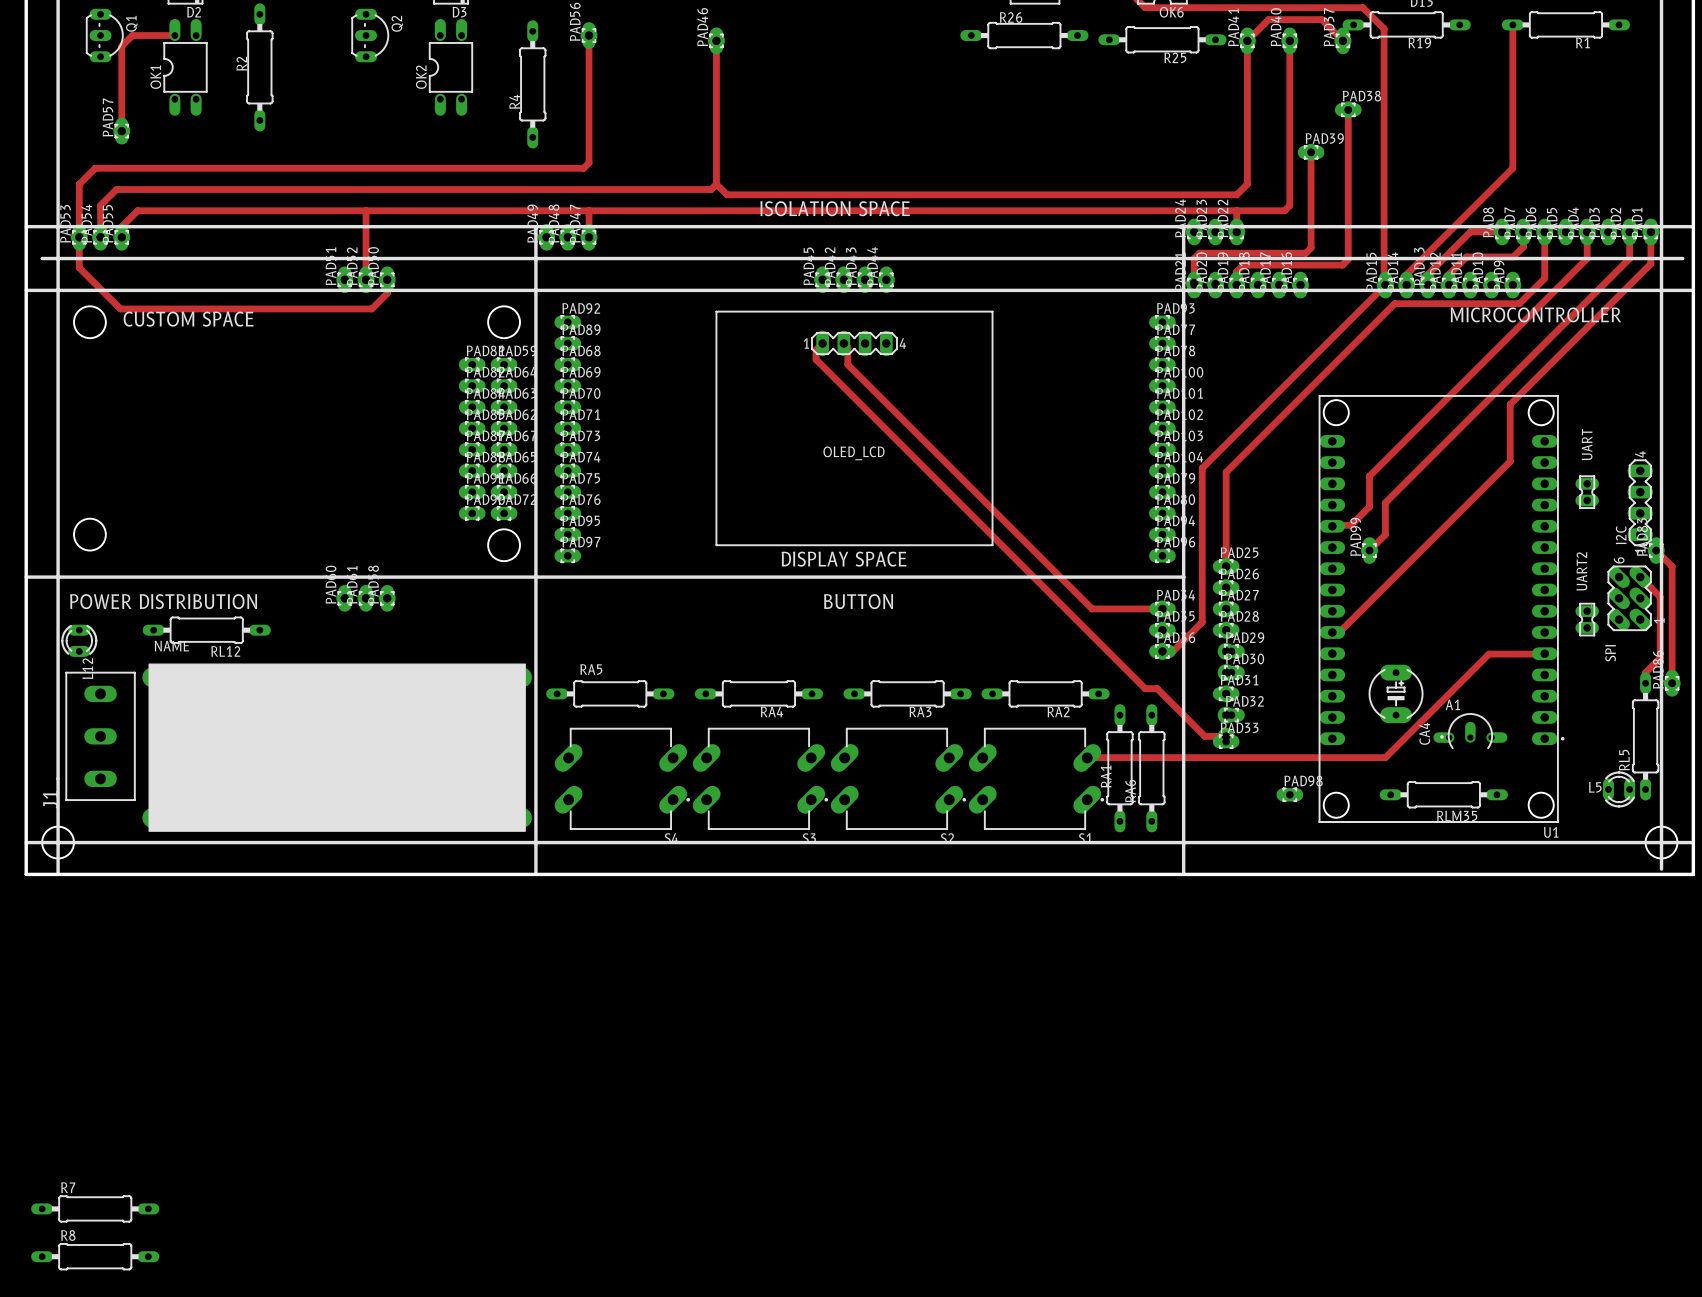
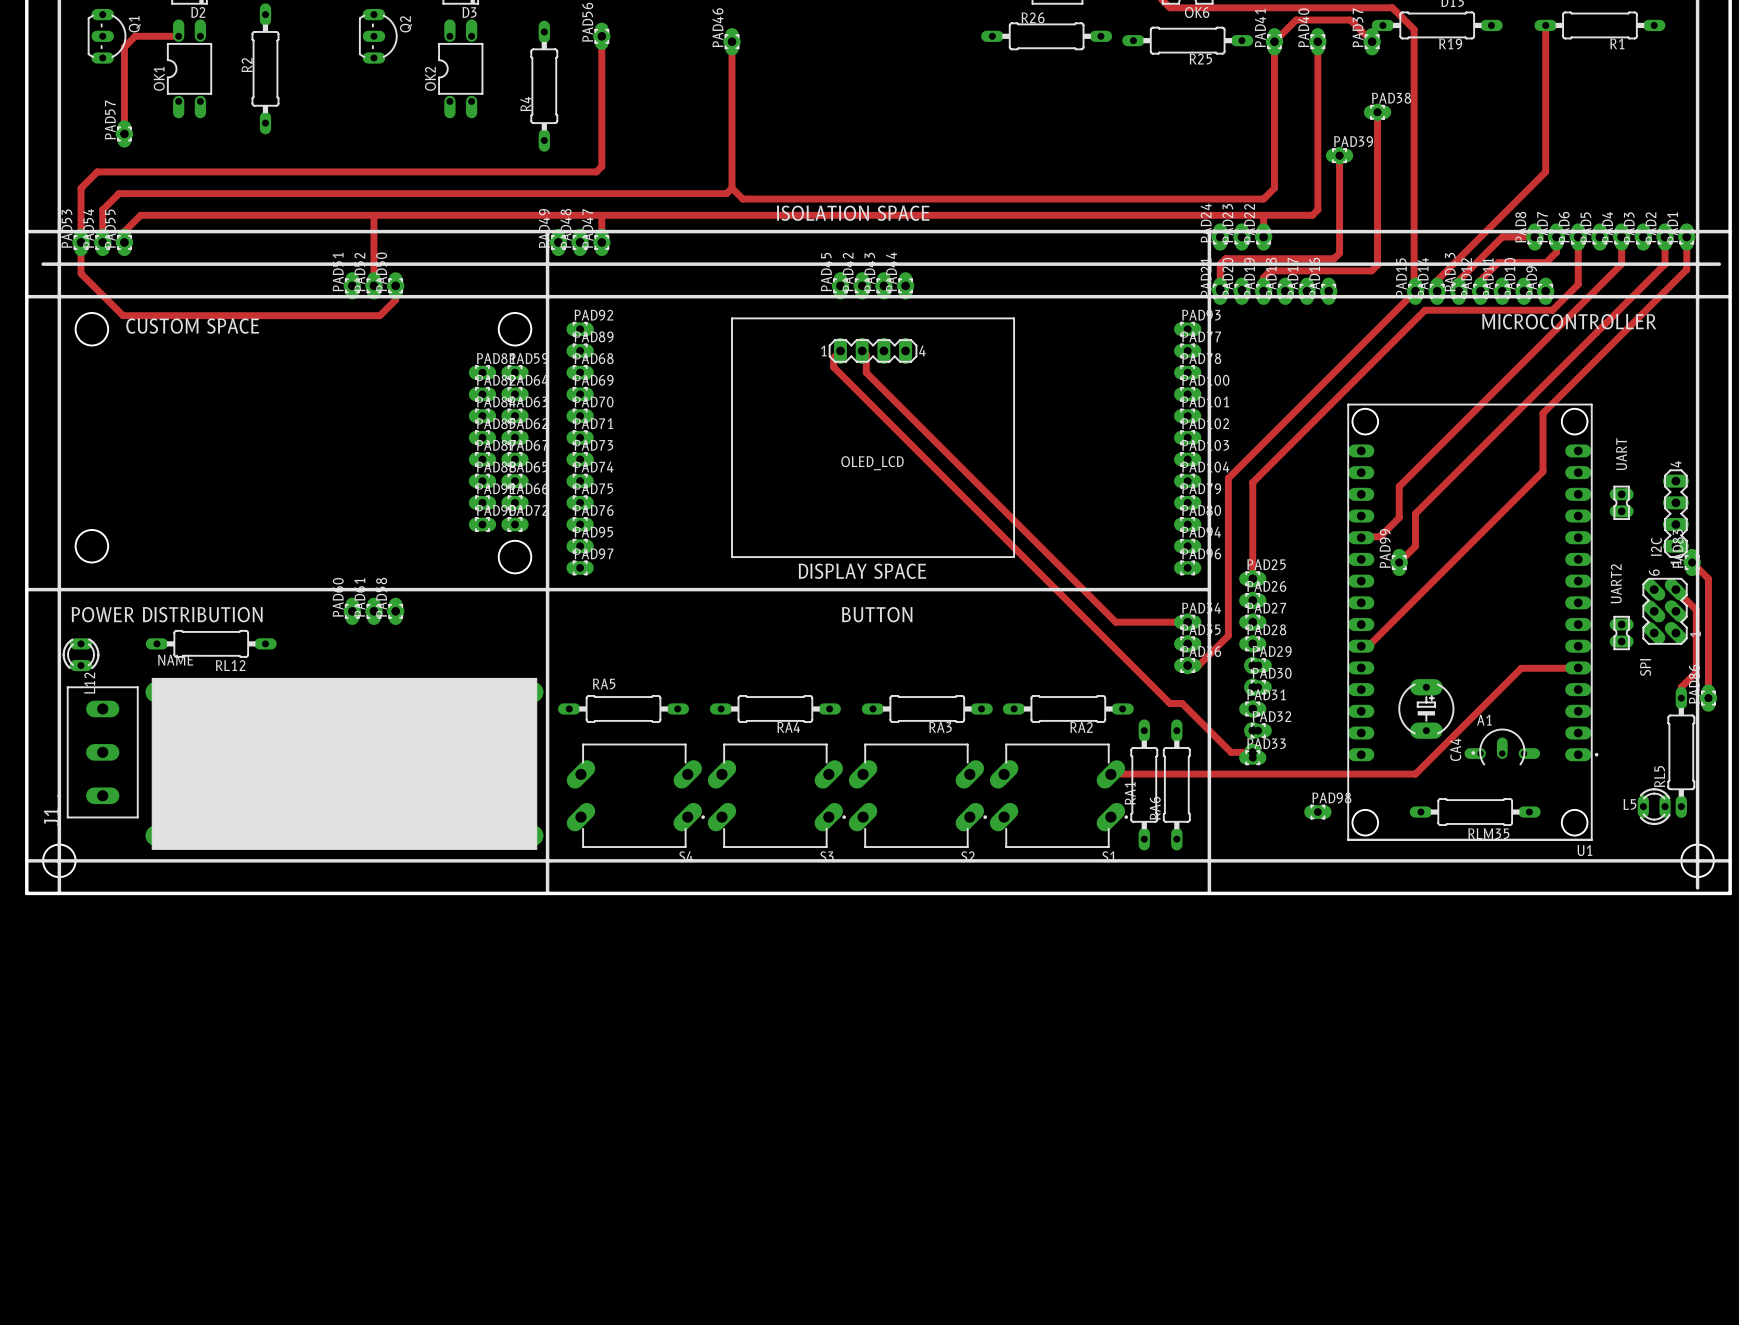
R7: (95, 1208) -> none
R8: (95, 1256) -> none

